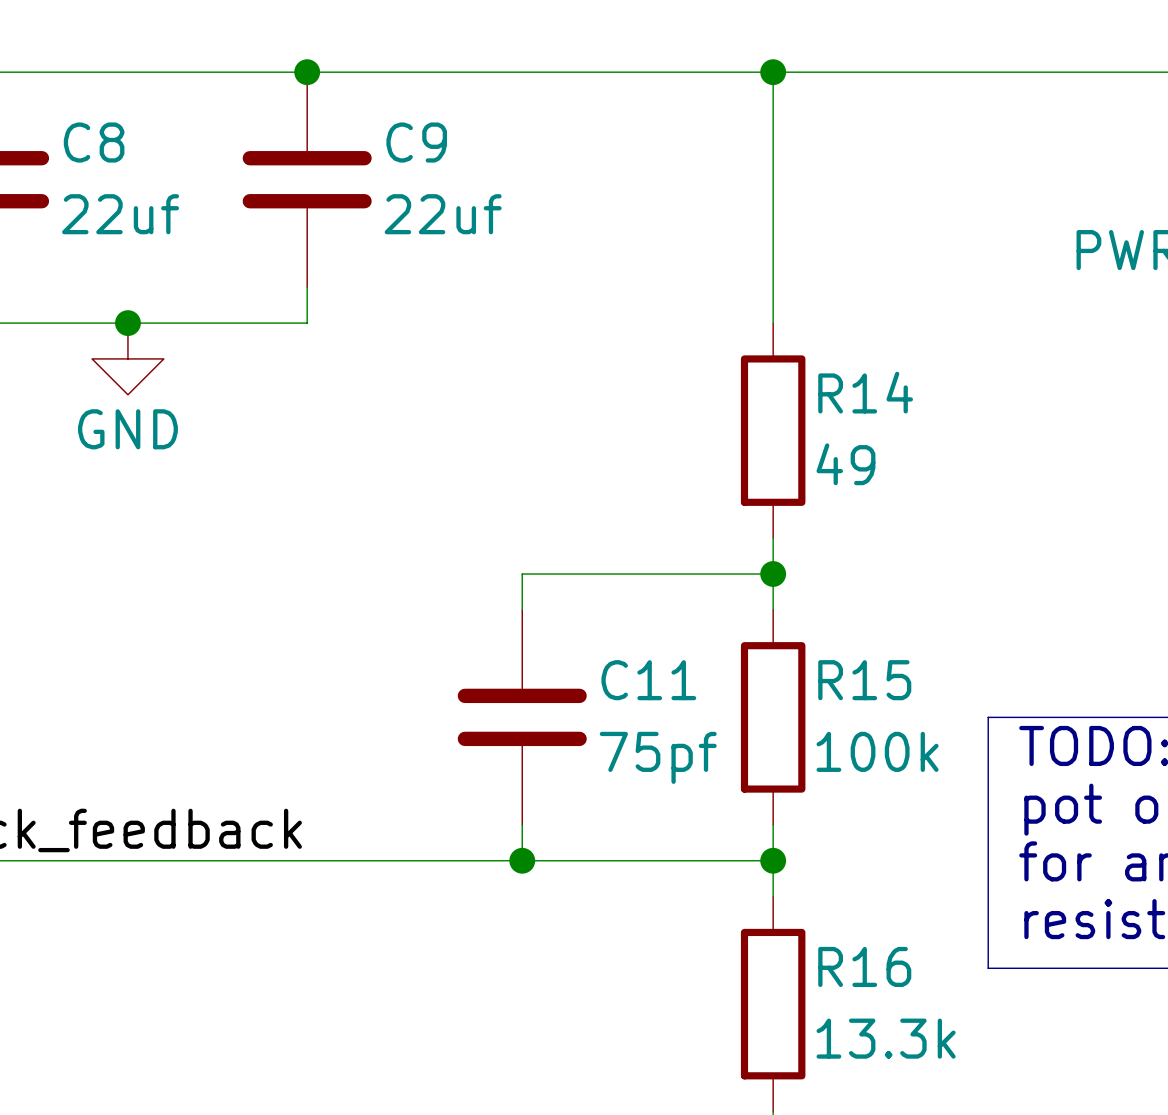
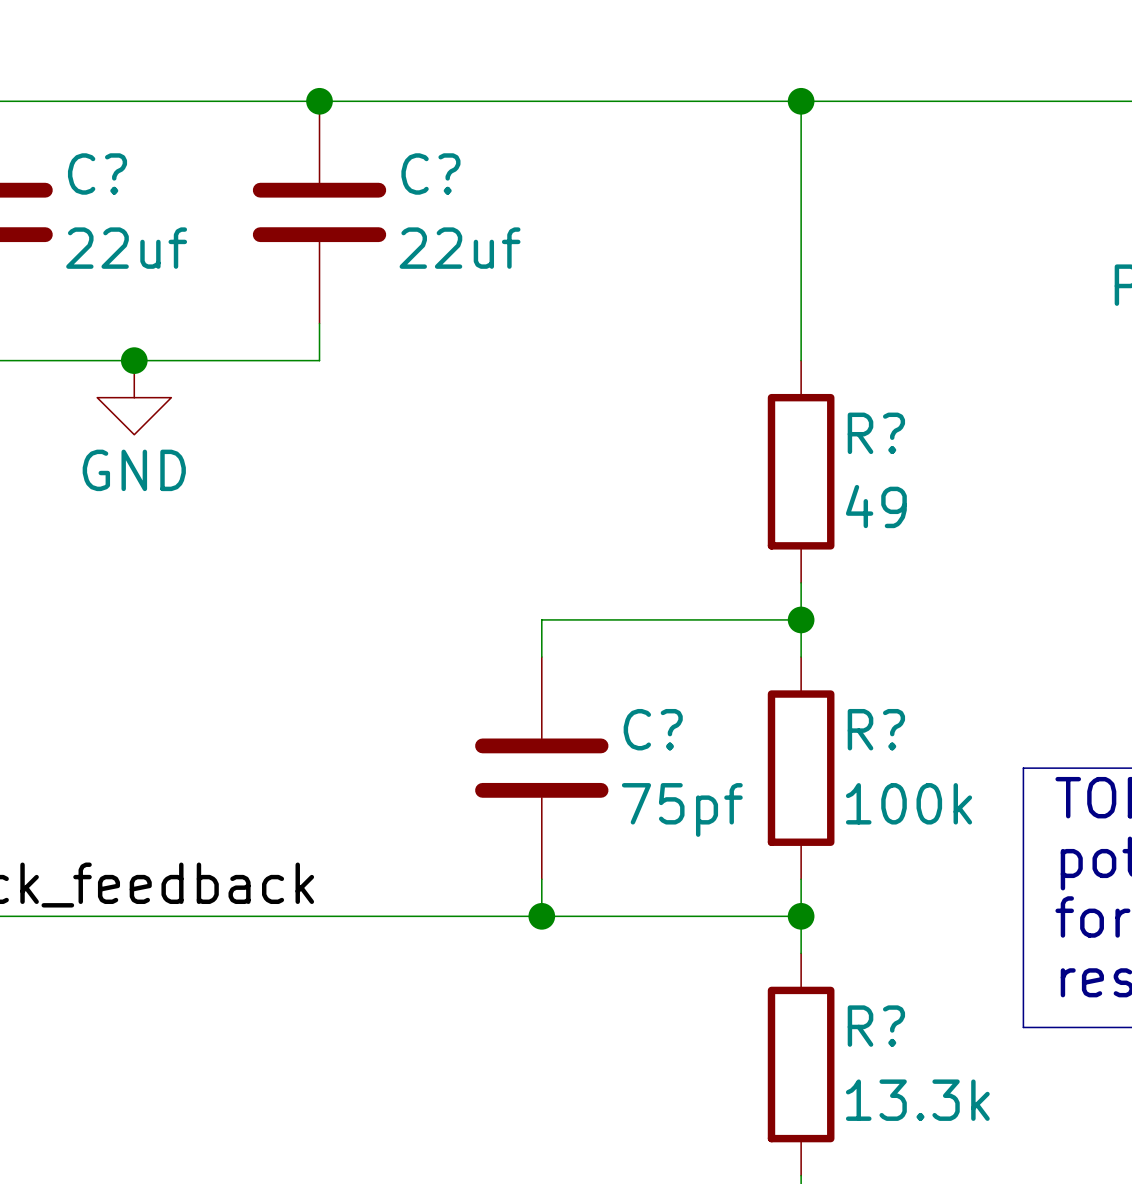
C8 name: C8 (94, 142) -> C? (97, 174)
C9 name: C9 (416, 142) -> C? (430, 174)
R14 name: R14 (865, 392) -> R? (876, 433)
C11 name: C11 (648, 680) -> C? (653, 729)
R15 name: R15 (864, 680) -> R? (876, 729)
R16 name: R16 (864, 966) -> R? (876, 1026)

